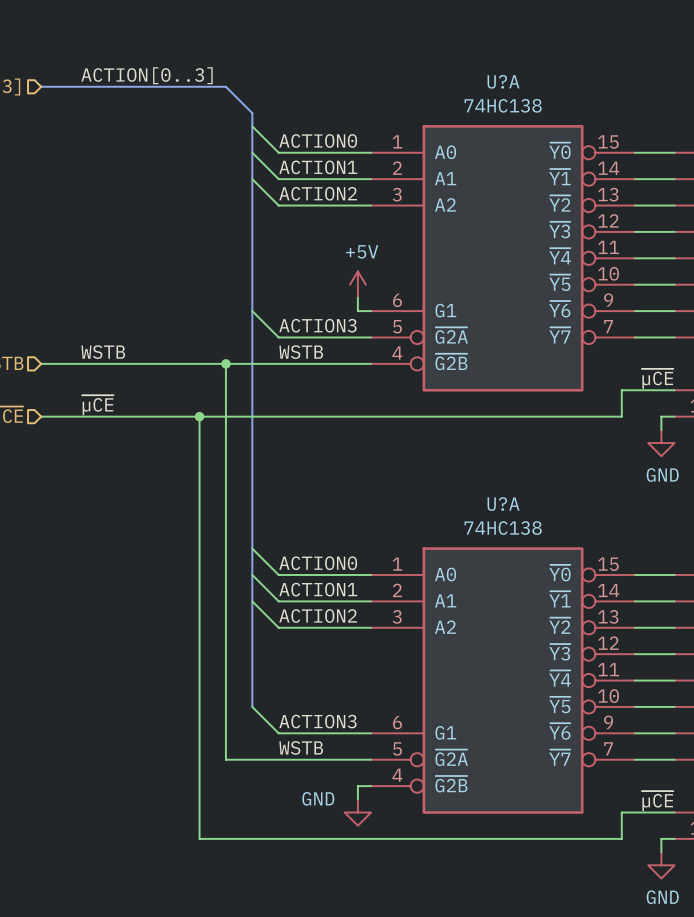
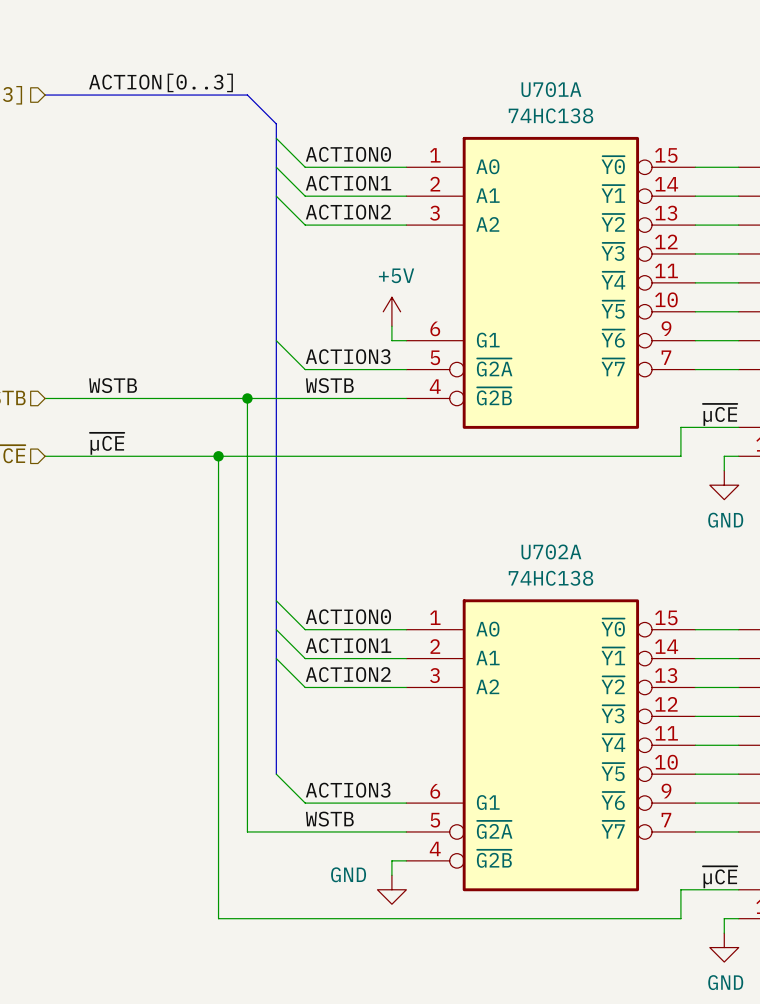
U?A name: U?A (503, 81) -> U701A (551, 89)
U?A name: U?A (503, 504) -> U702A (551, 551)

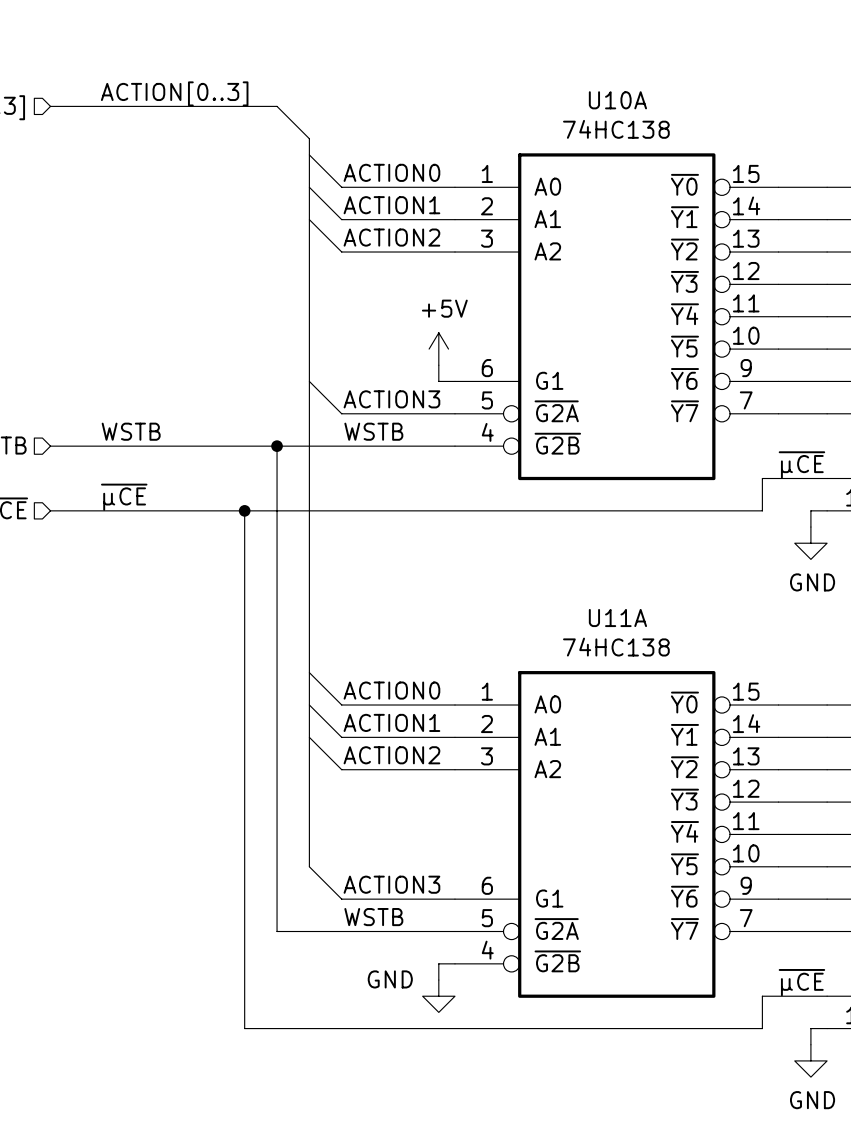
U701A name: U701A (551, 89) -> U10A (617, 100)
U702A name: U702A (551, 551) -> U11A (617, 618)

